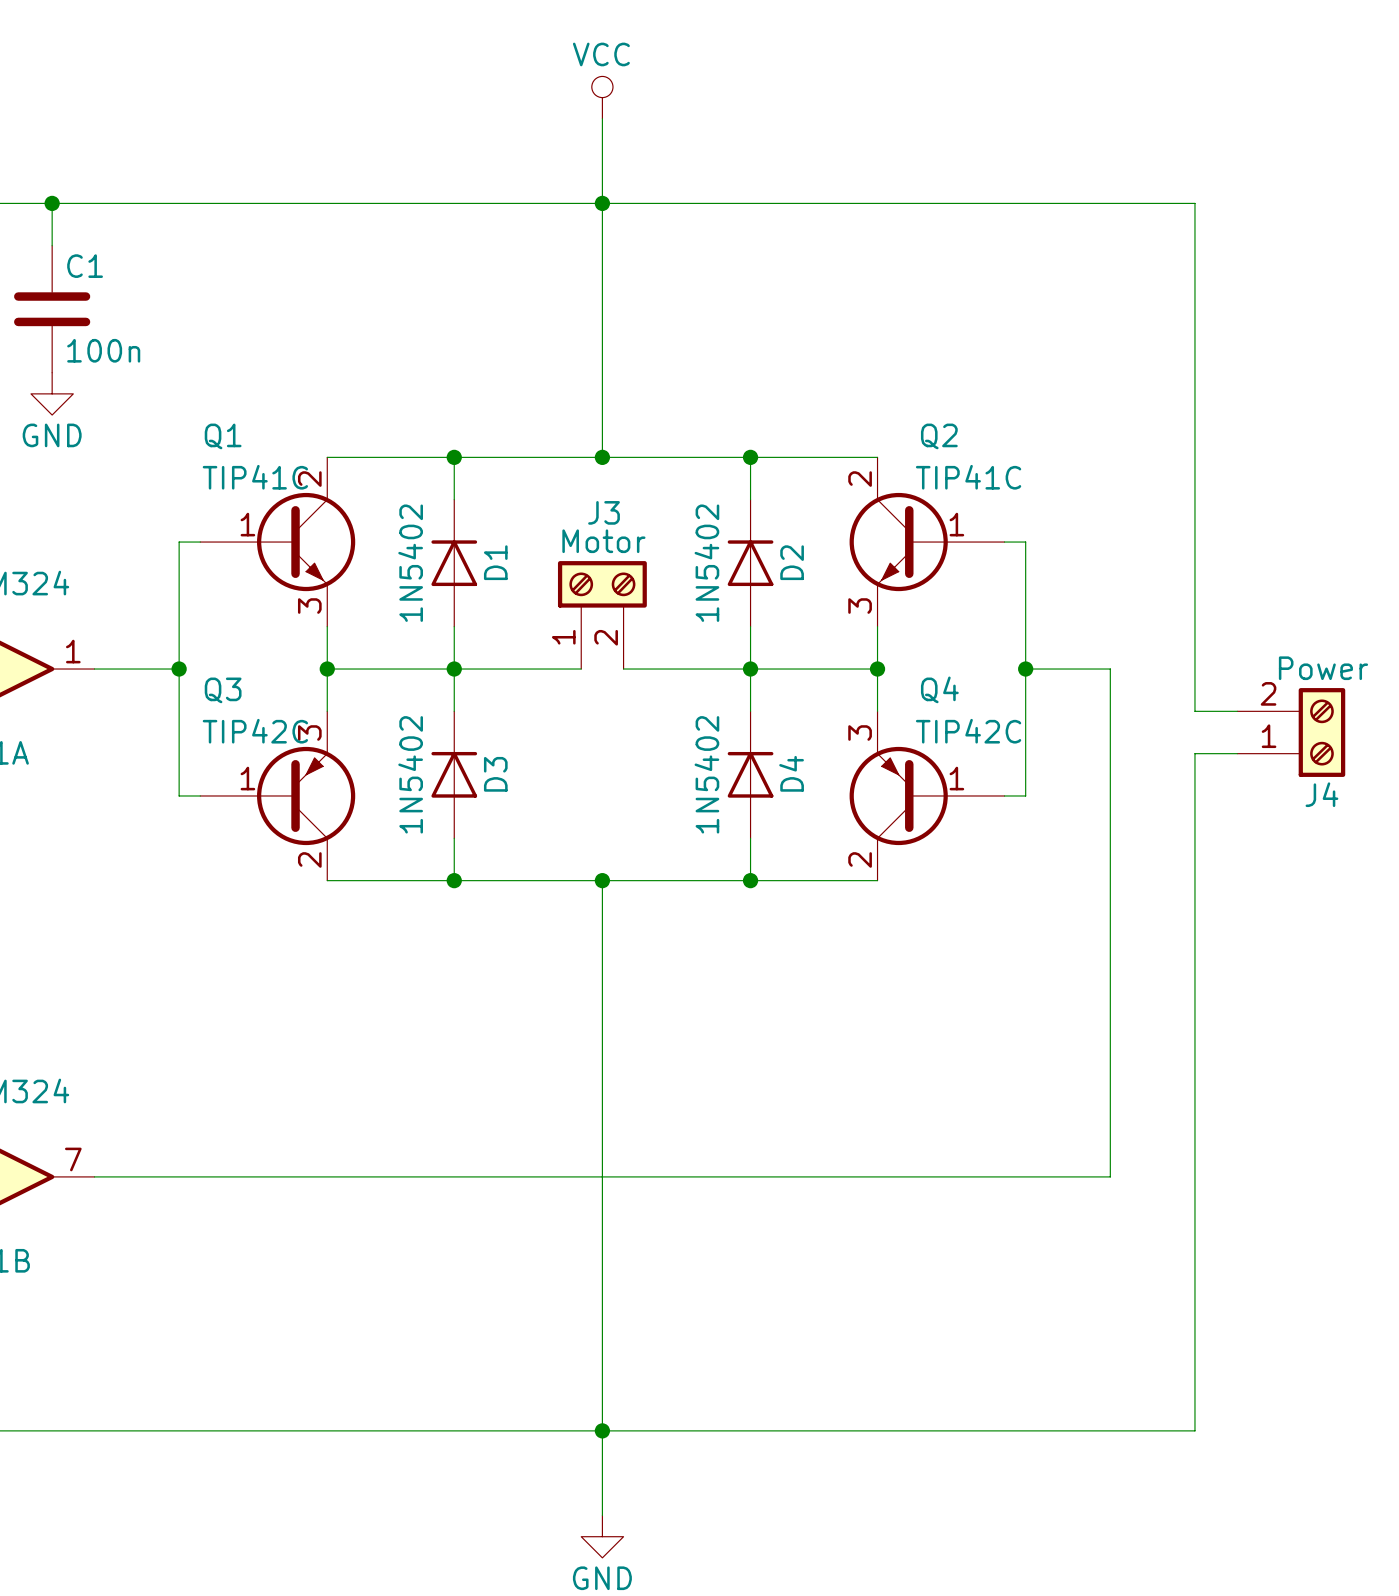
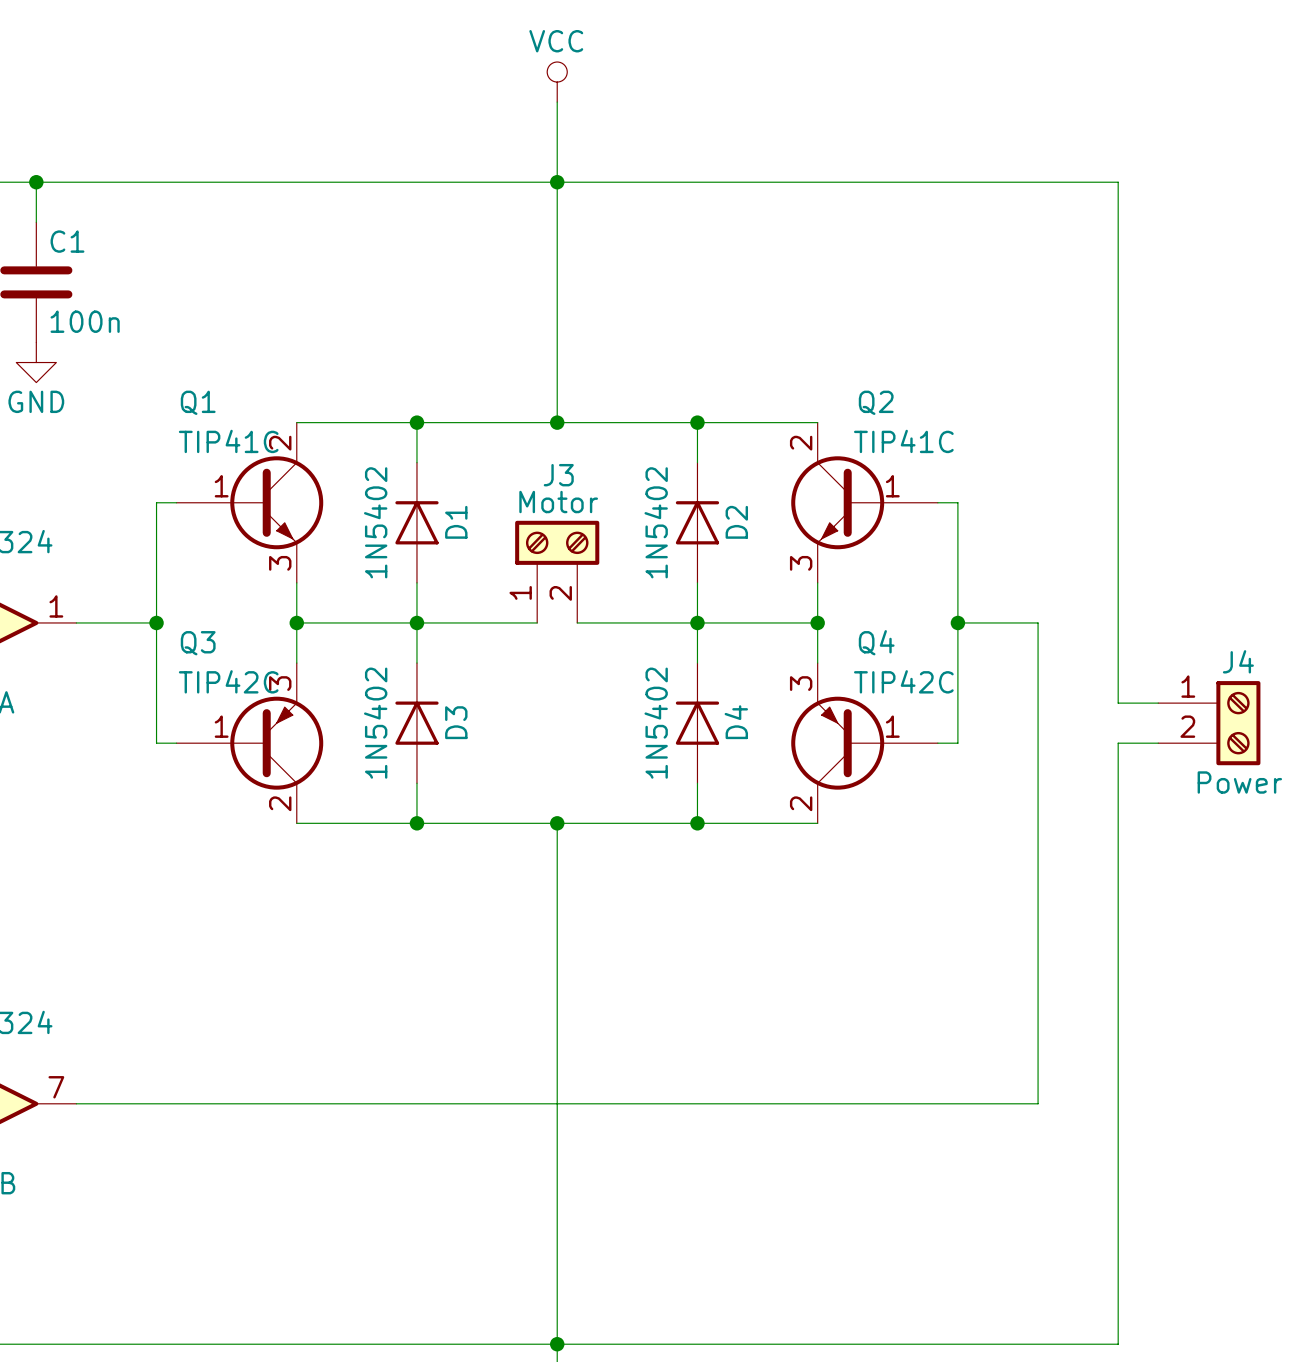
wire: (1194, 711) (1237, 711) -> (1118, 663) (1118, 703)
J4 flip: as is (1321, 732) -> up-down (1238, 723)
wire: (1194, 753) (1194, 795) -> (1158, 743) (1118, 743)

